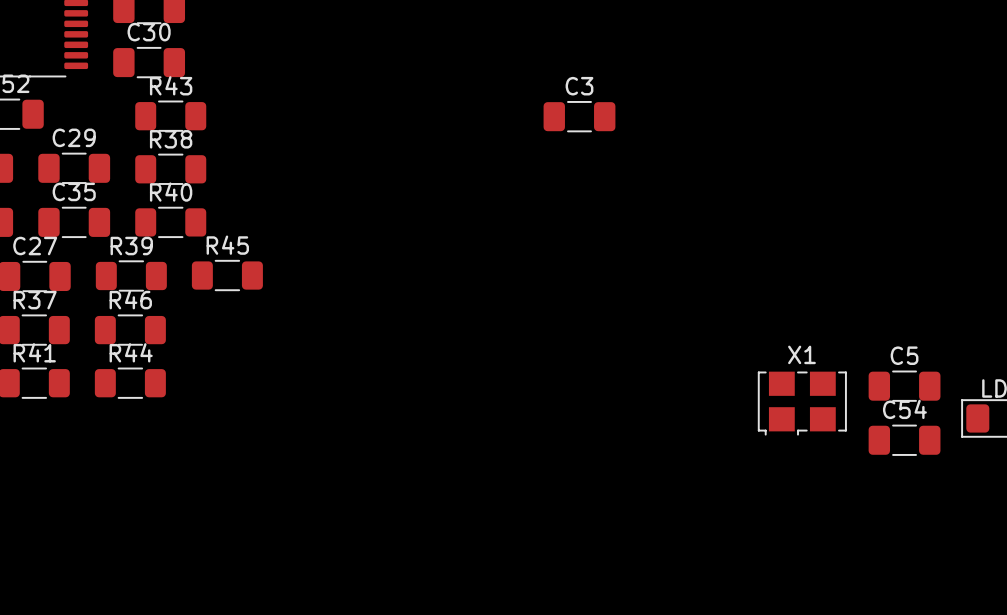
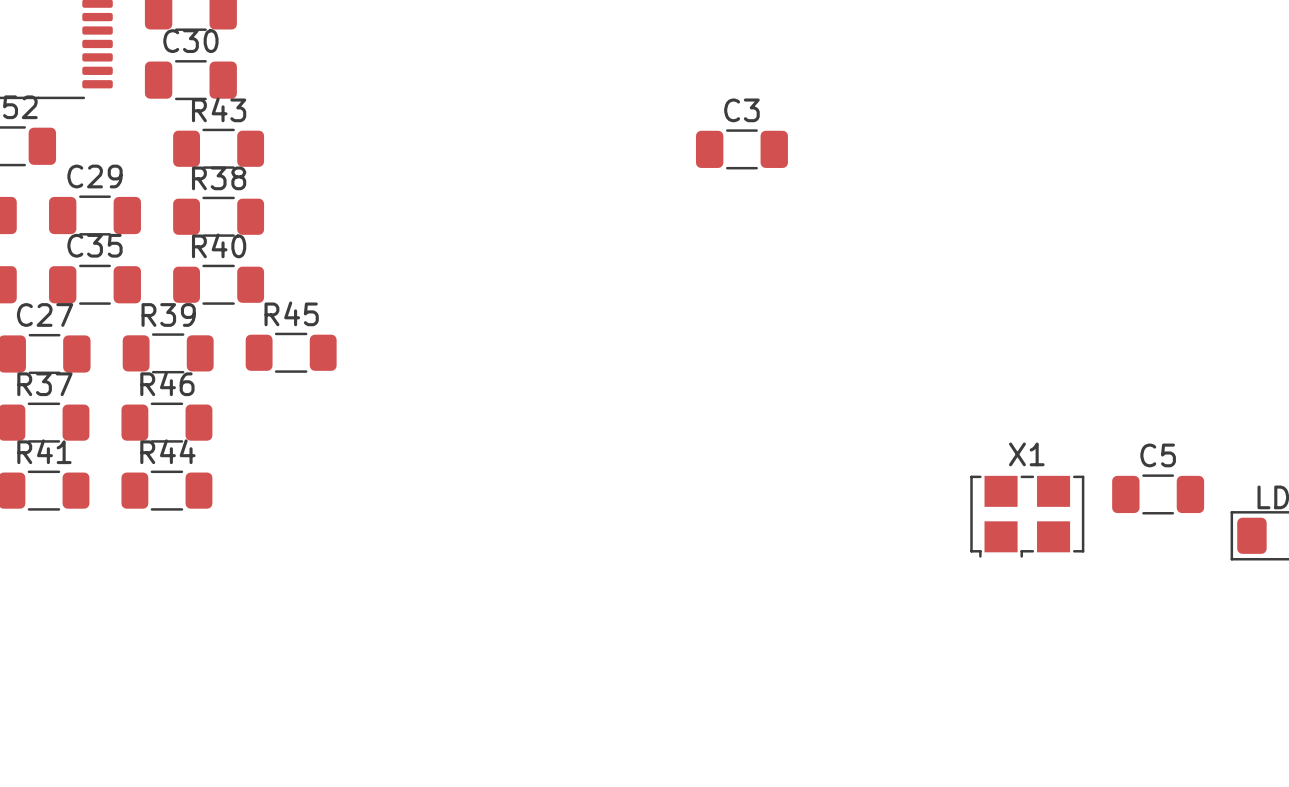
C54: (904, 440) -> none

